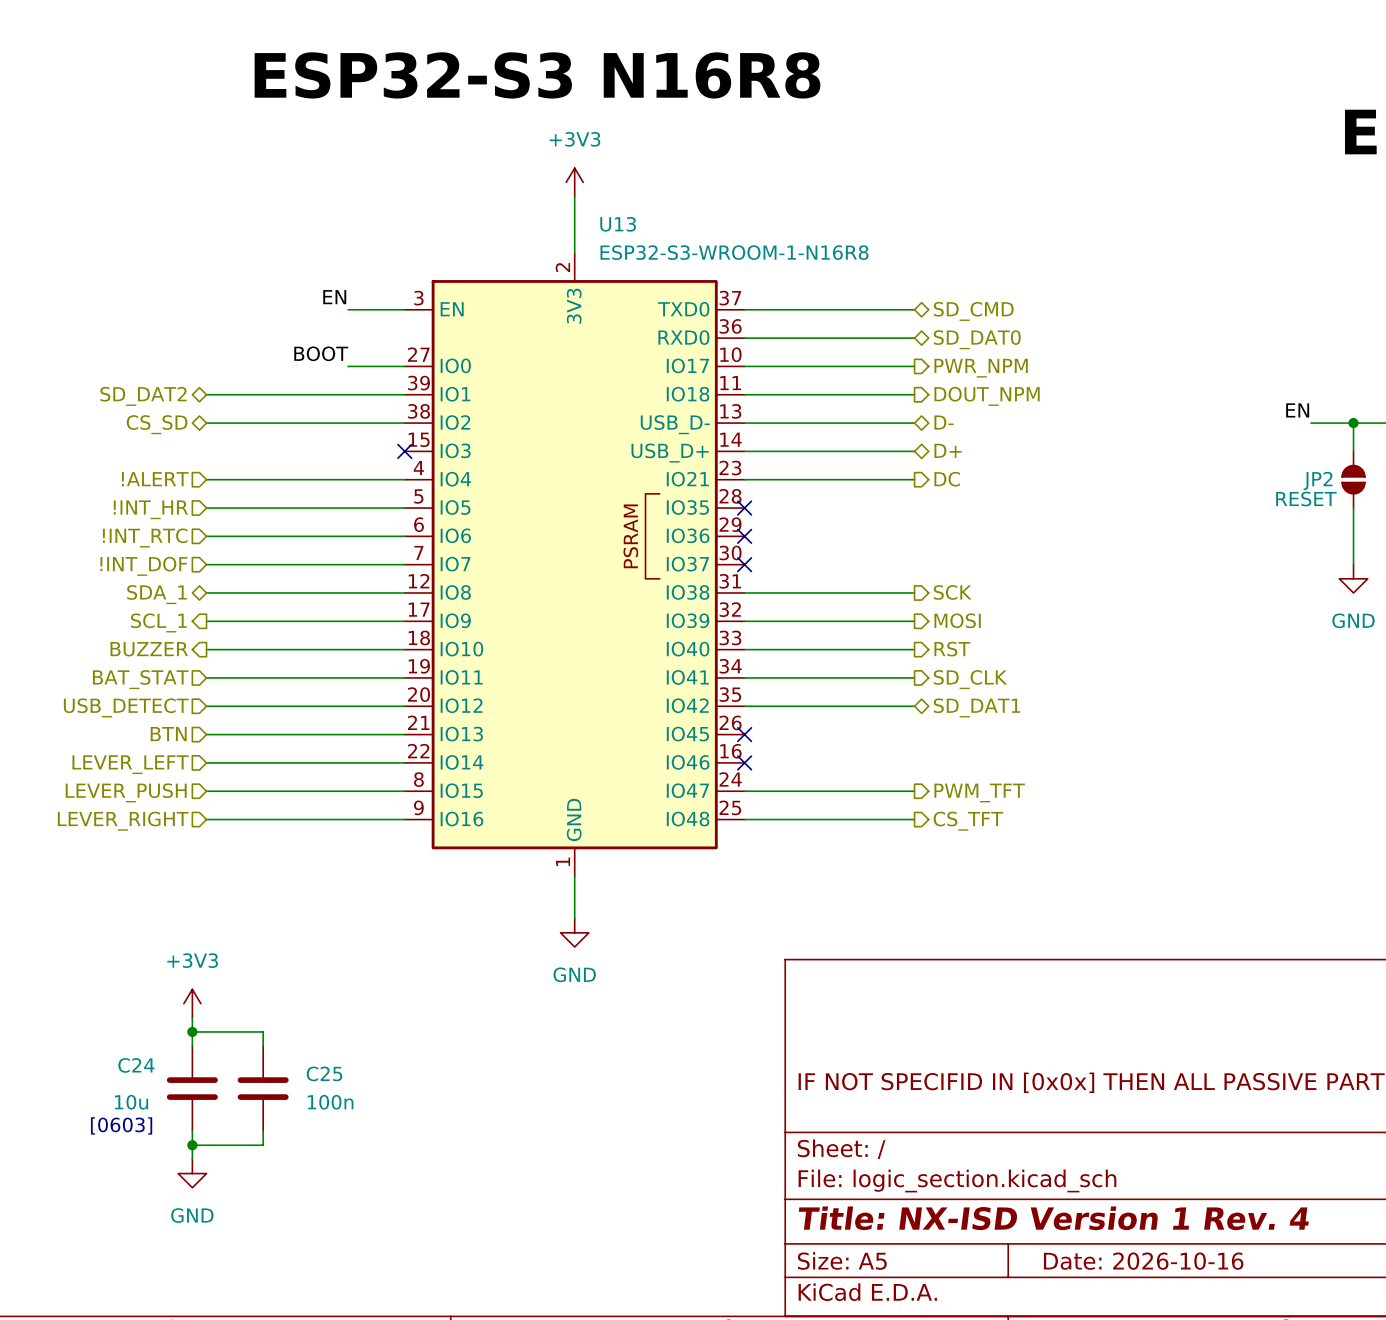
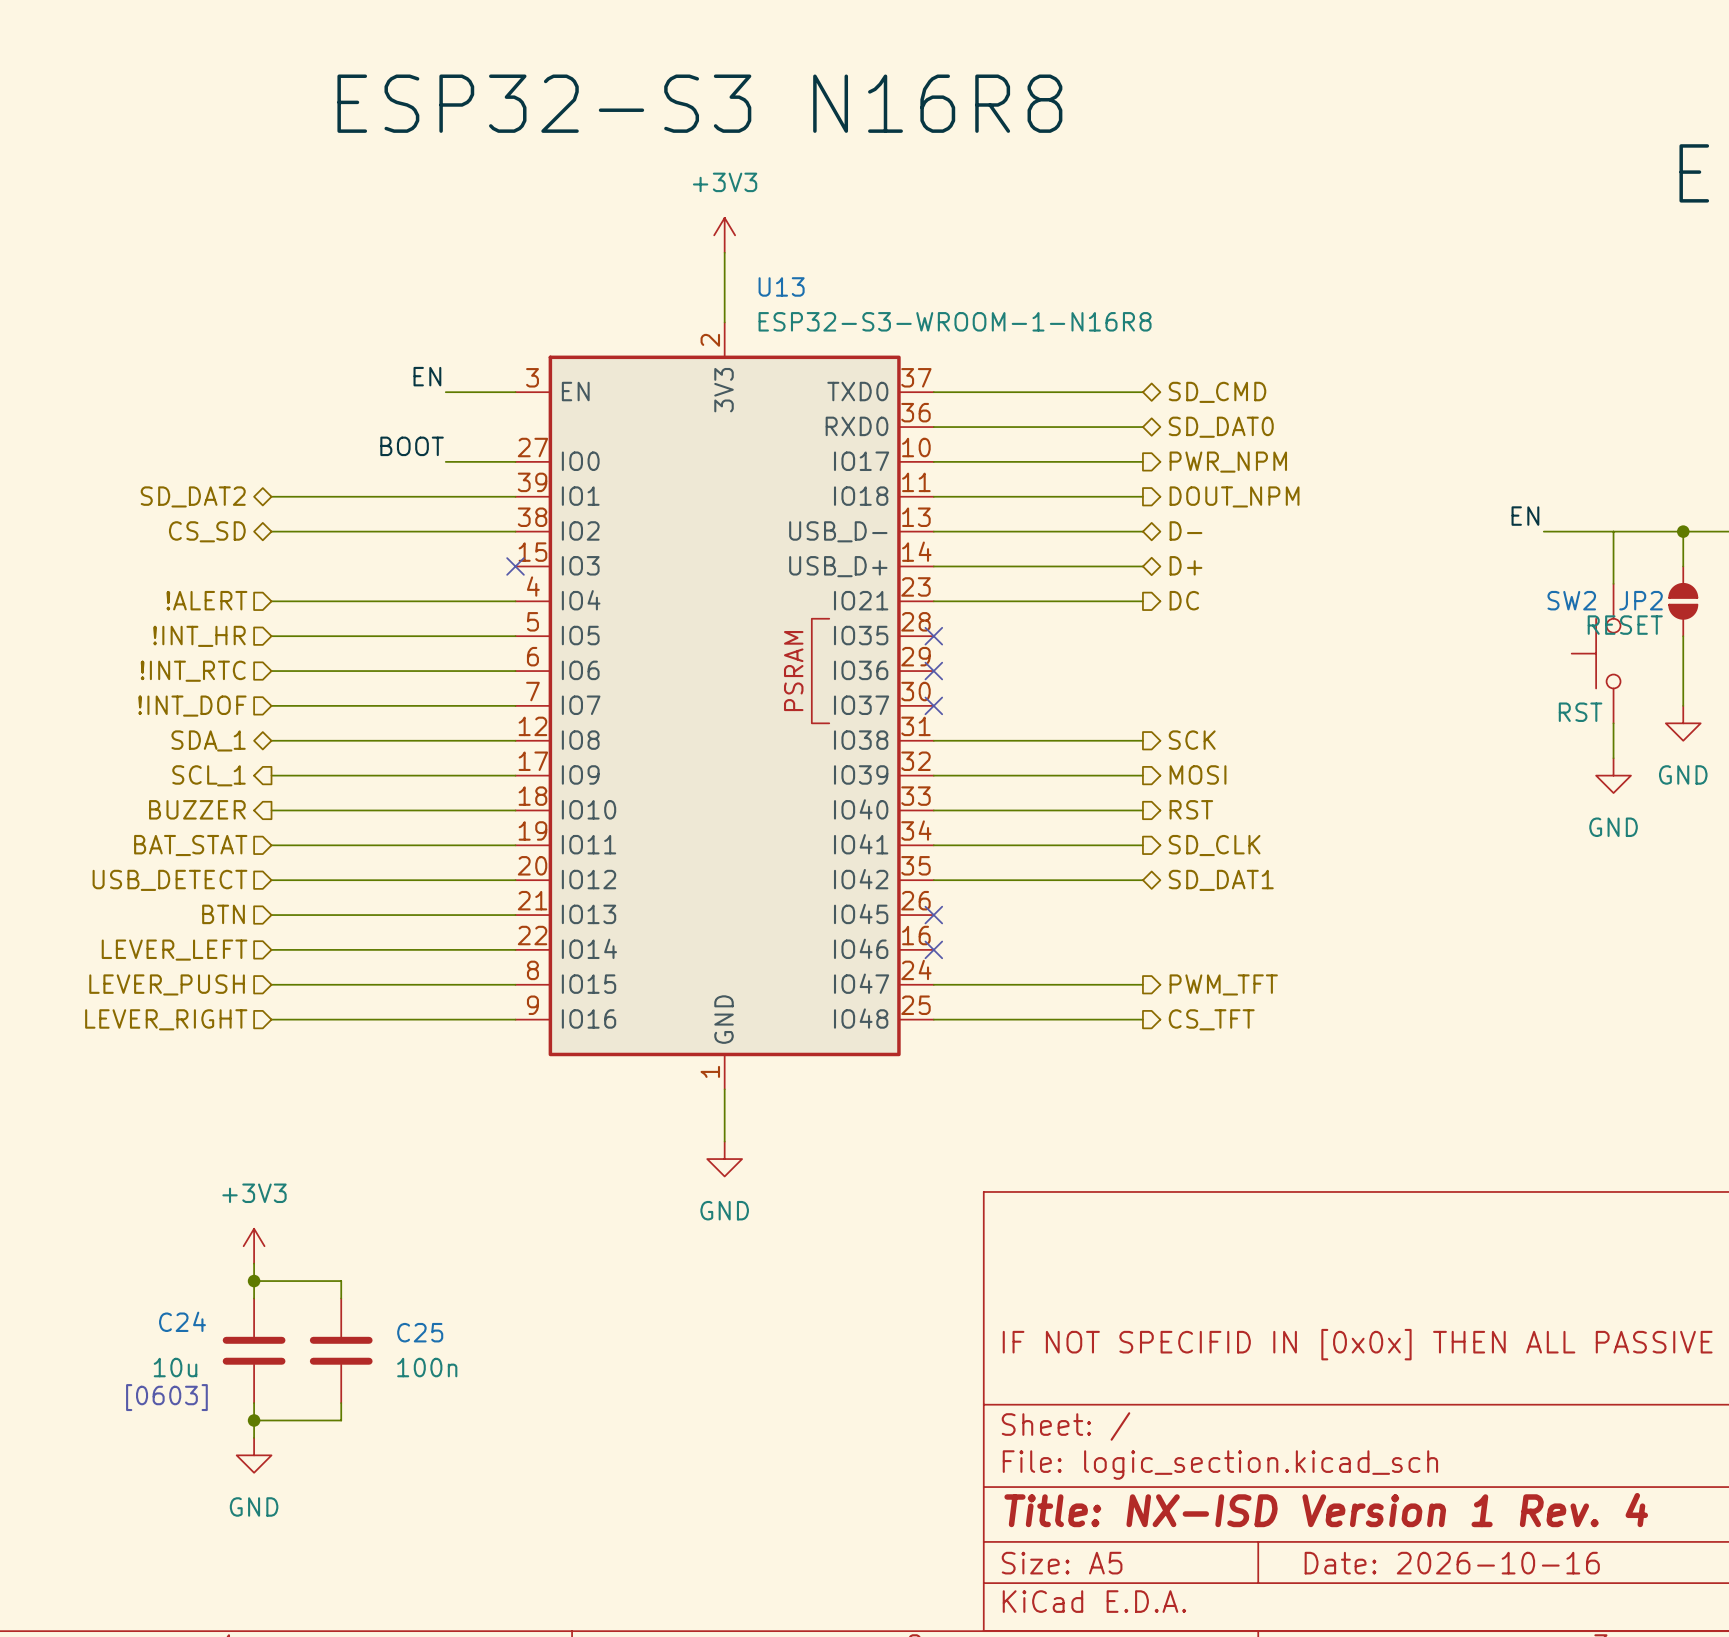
label position: EN (1297, 410) -> EN (1525, 516)
wire: none -> (1543, 531) (1630, 531)
wire: none -> (1613, 531) (1613, 583)
SW2: none -> RST (1596, 653)
wire: none -> (1613, 723) (1613, 758)
power symbol: none -> GND (1613, 775)

